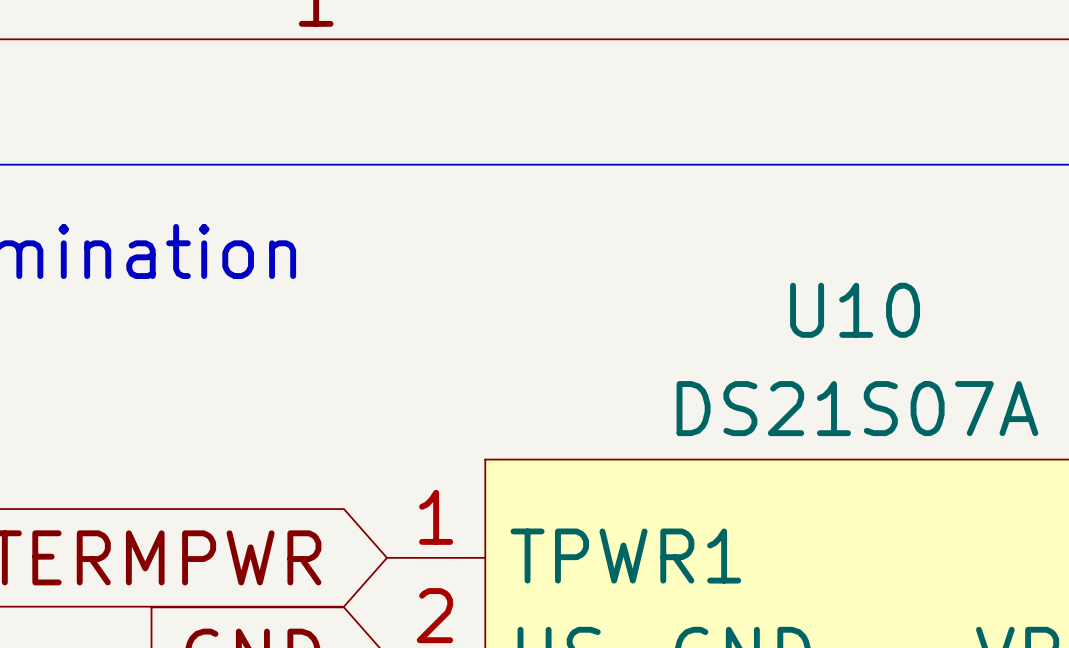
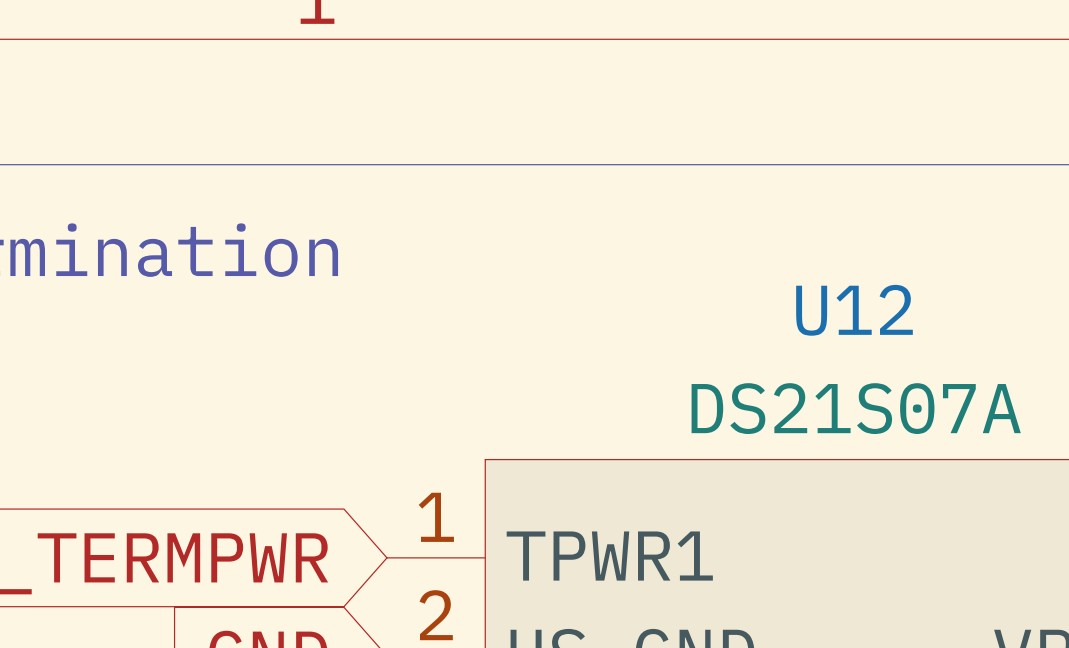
U10 name: U10 (855, 310) -> U12 (854, 310)

